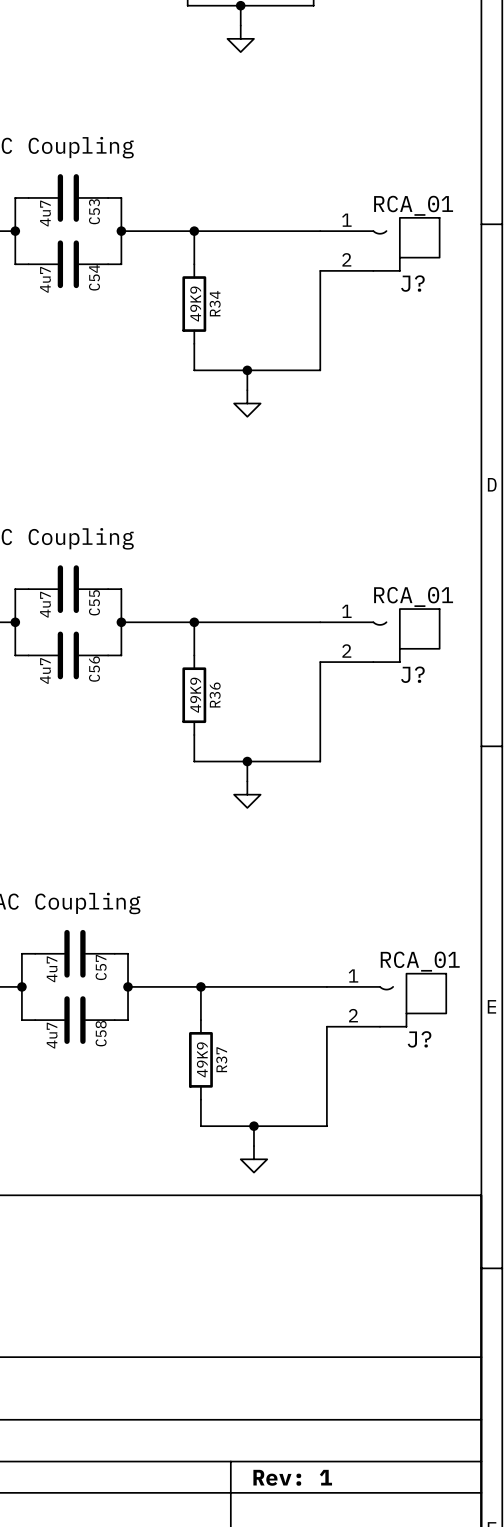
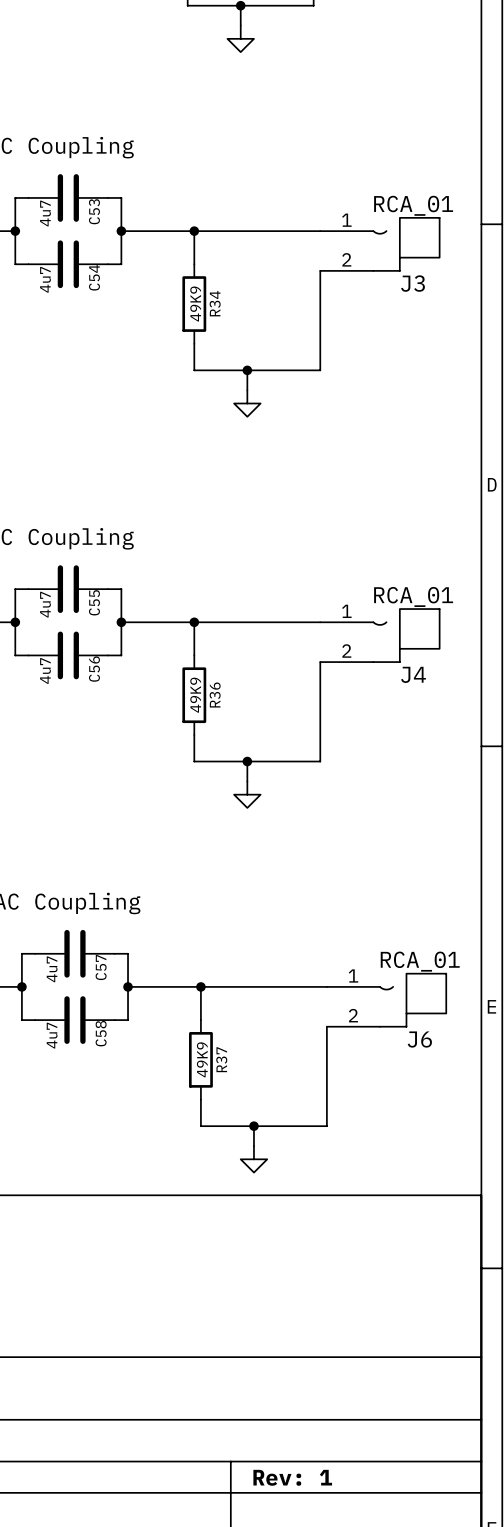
J? name: J? (412, 283) -> J3 (413, 283)
J? name: J? (412, 674) -> J4 (413, 674)
J? name: J? (419, 1039) -> J6 (419, 1039)

